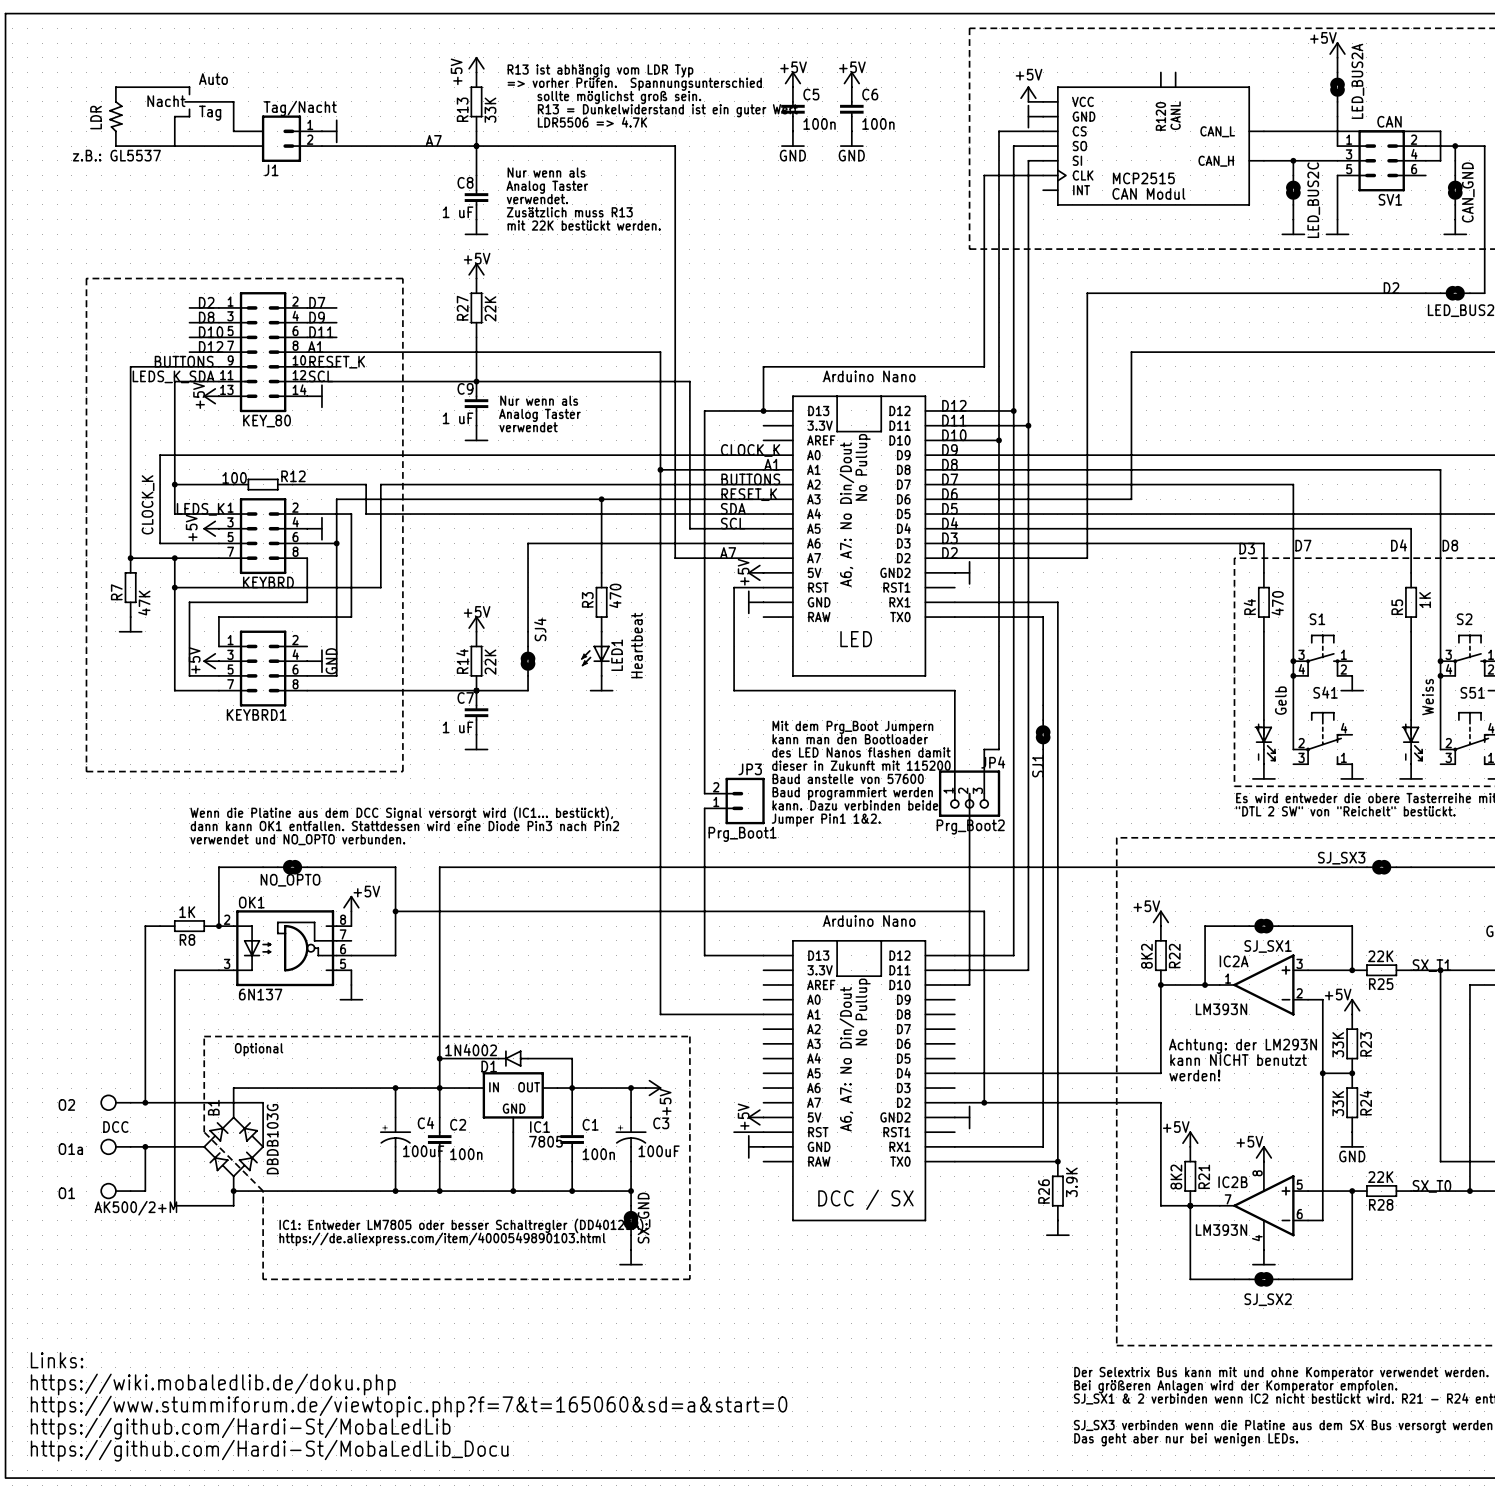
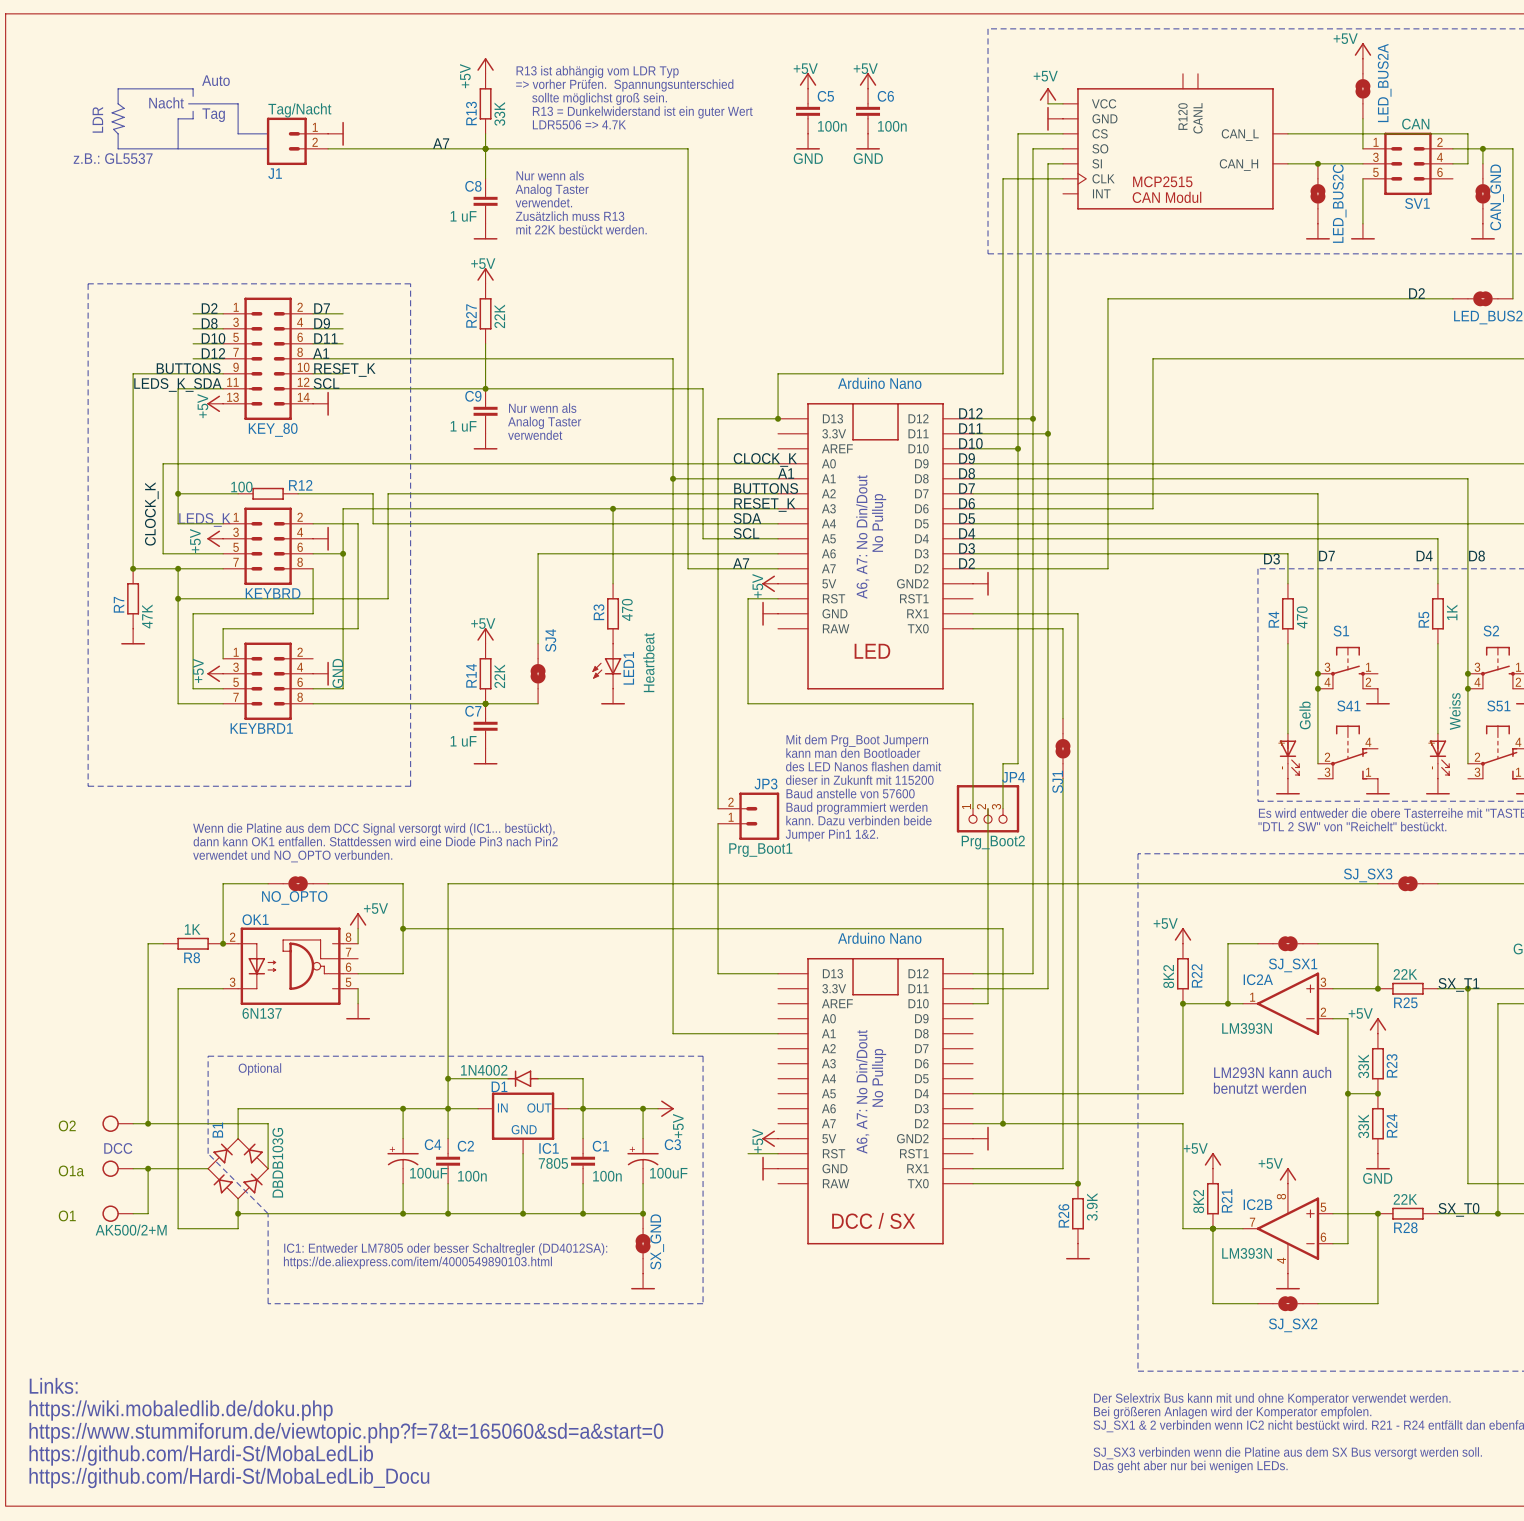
text: Achtung: der LM293N (1242, 1046) -> none
text: none -> LM293N kann auch (1272, 1072)
text: kann NICHT benutzt (1238, 1060) -> none
text: none -> benutzt werden (1259, 1088)
text: werden! (1194, 1075) -> none

